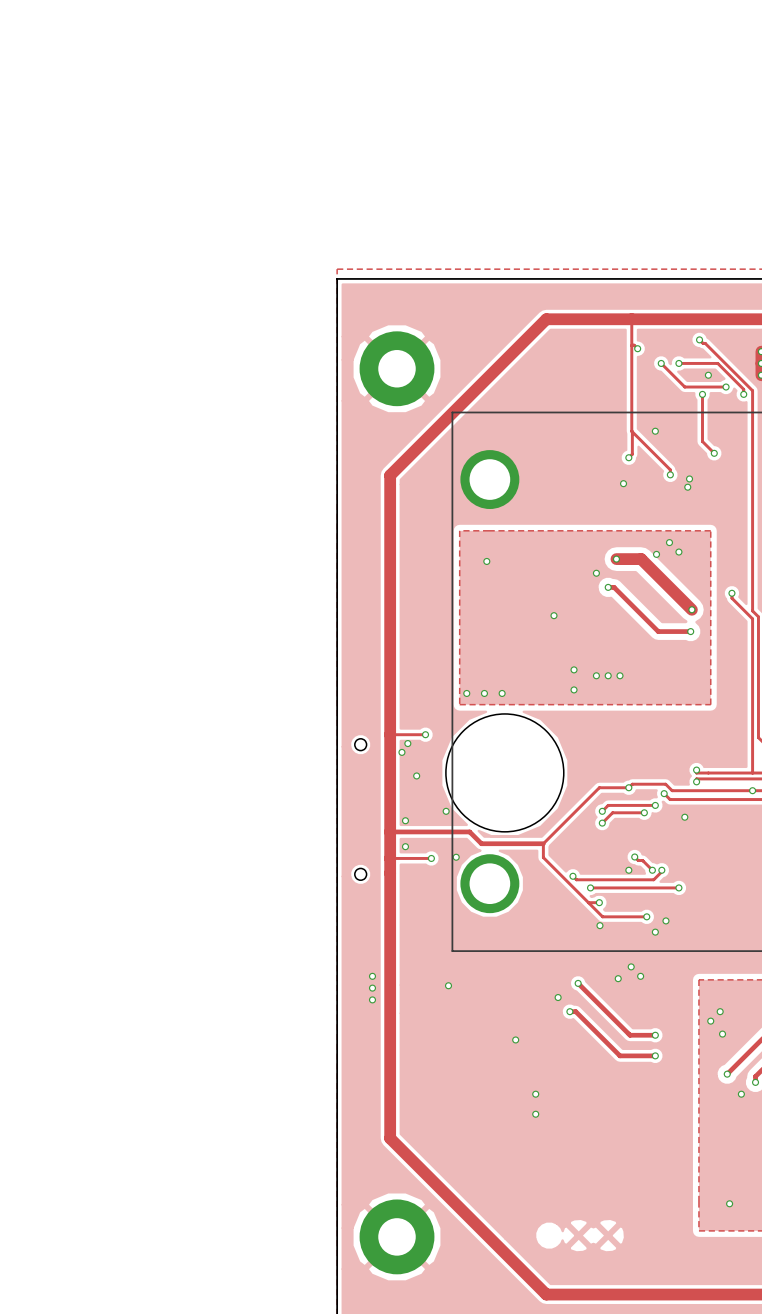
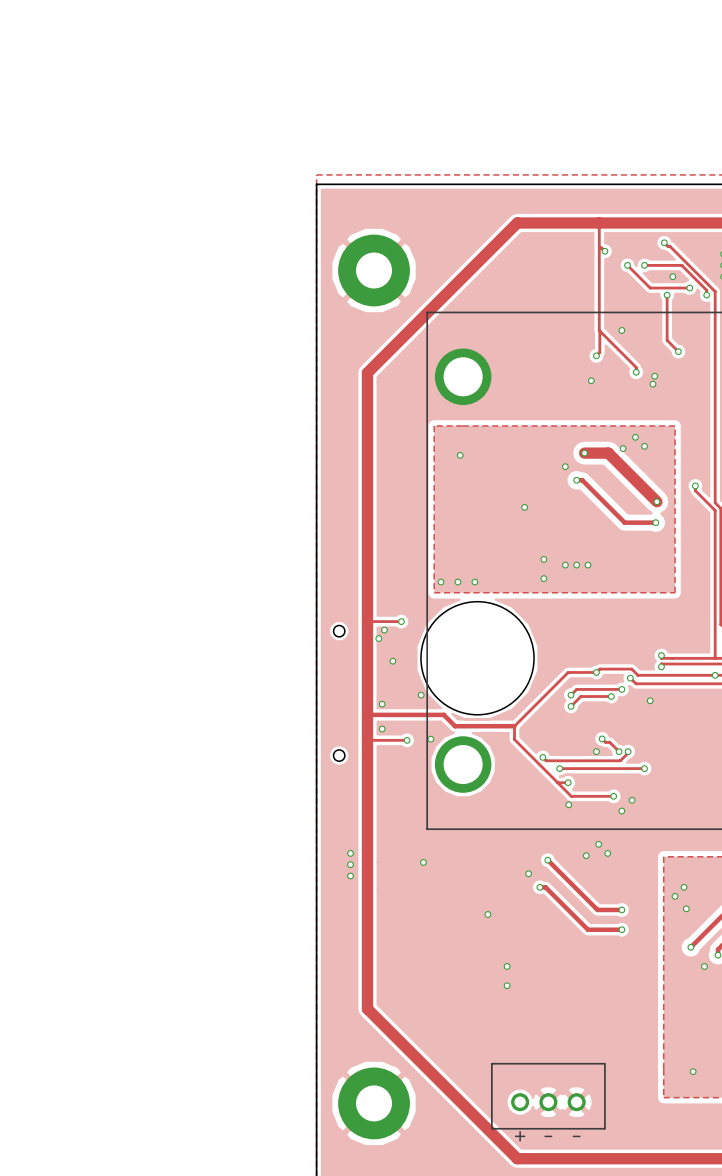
part: none -> (548, 1096)
text: none -> + (520, 1136)
text: none -> - (548, 1136)
text: none -> - (576, 1136)

